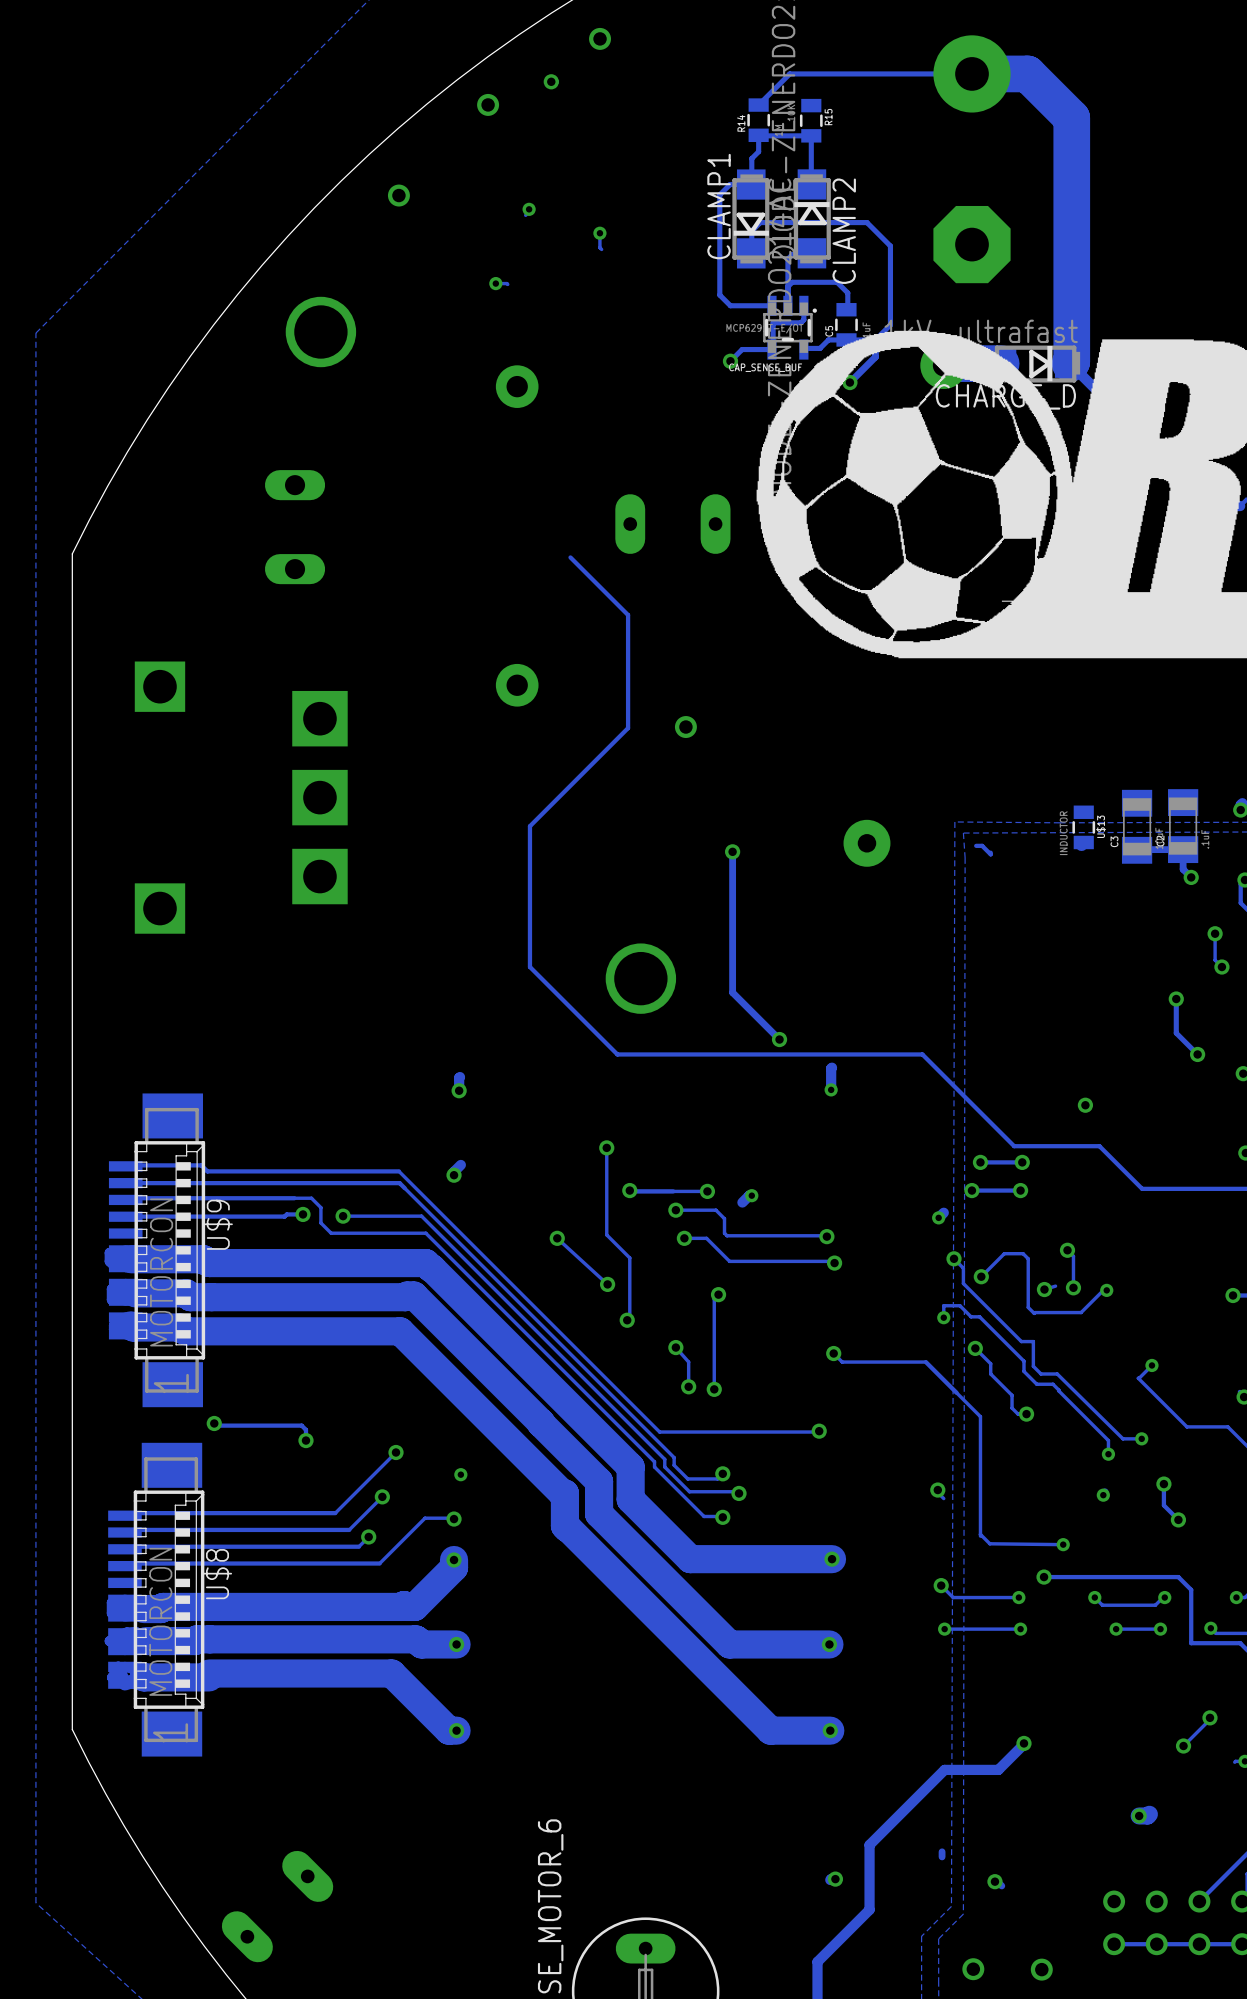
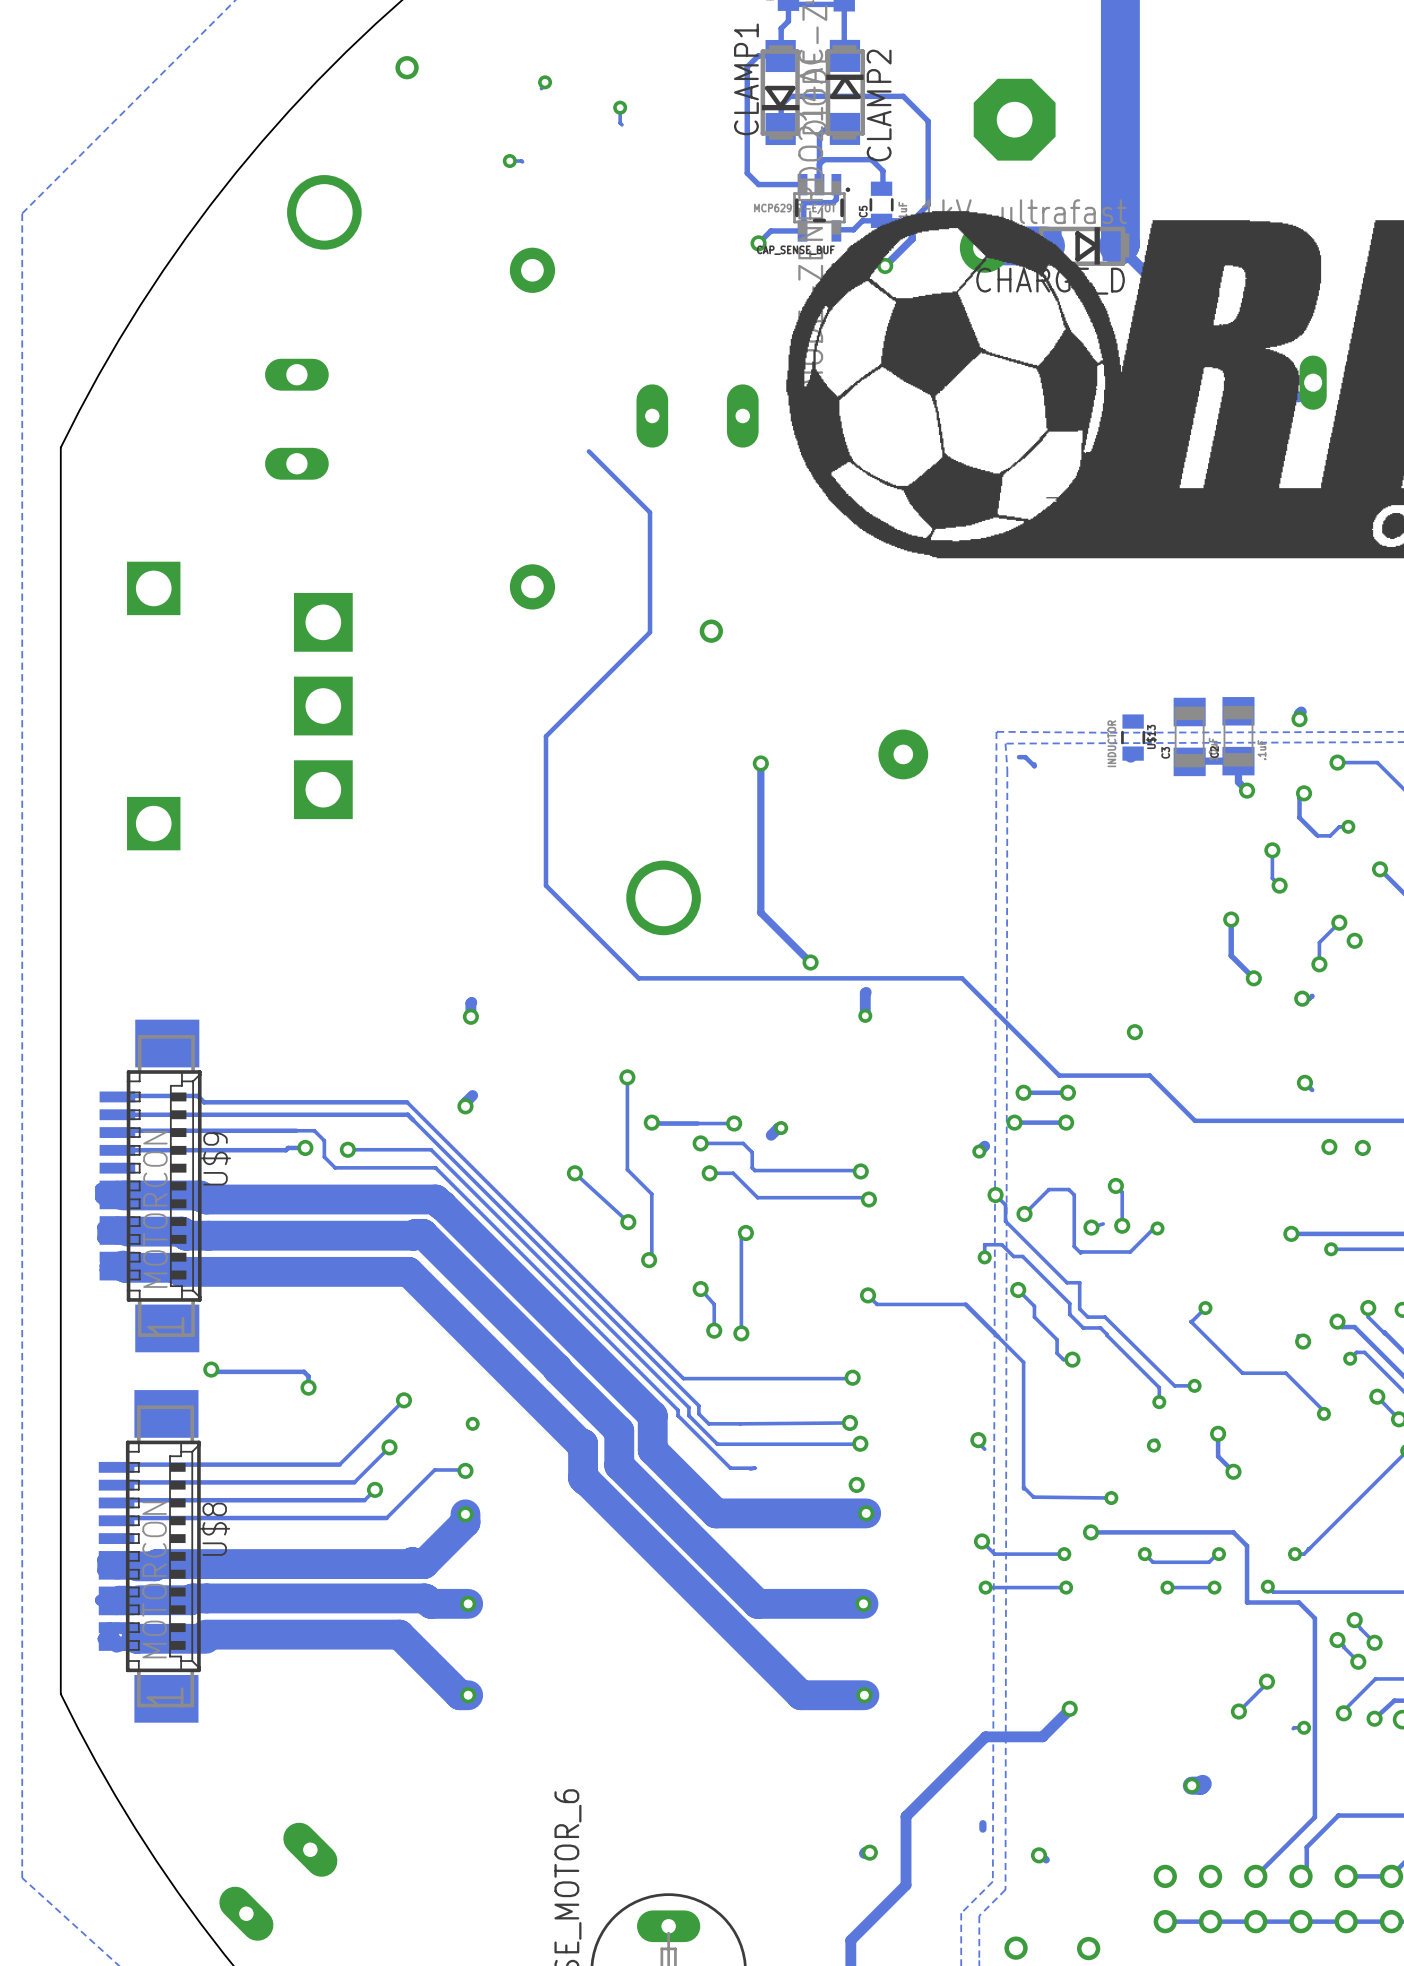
track: (722, 1473) (717, 1478) (687, 1478) (683, 1474) -> (849, 1422) (708, 1423)
via: (722, 1473) -> none
via: none -> (849, 1422)
track: (689, 1491) (737, 1491) (739, 1493) -> (715, 1441) (717, 1444) (860, 1443)
via: (739, 1493) -> none
via: none -> (860, 1443)
via: (722, 1517) -> none
via: none -> (856, 1484)

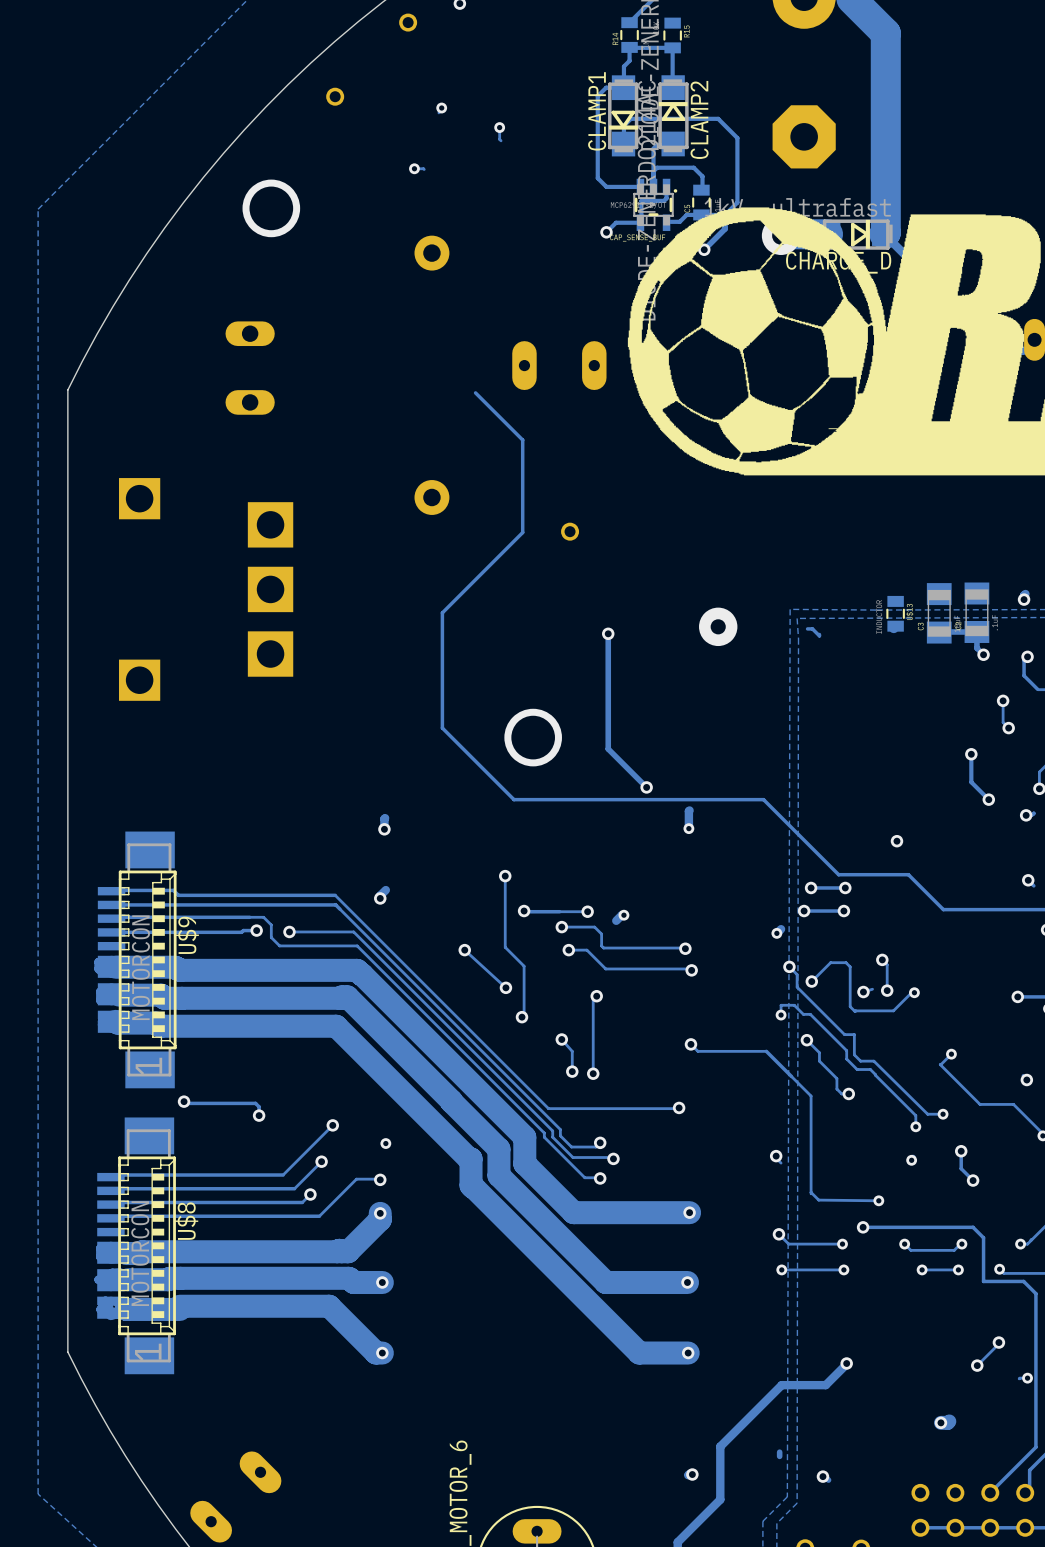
via: none -> (600, 1142)
track: (849, 1422) (708, 1423) -> (600, 1142) (596, 1147) (571, 1147) (568, 1143)
via: (849, 1422) -> none
track: (715, 1441) (717, 1444) (860, 1443) -> (572, 1157) (613, 1158)
via: none -> (613, 1158)
via: (860, 1443) -> none
via: none -> (600, 1178)
via: (856, 1484) -> none

